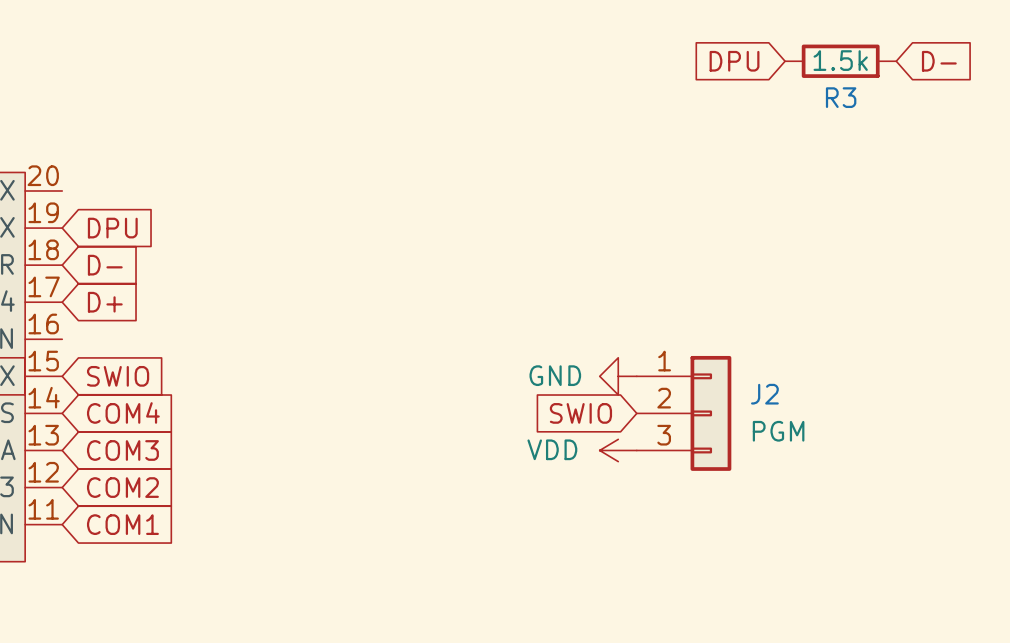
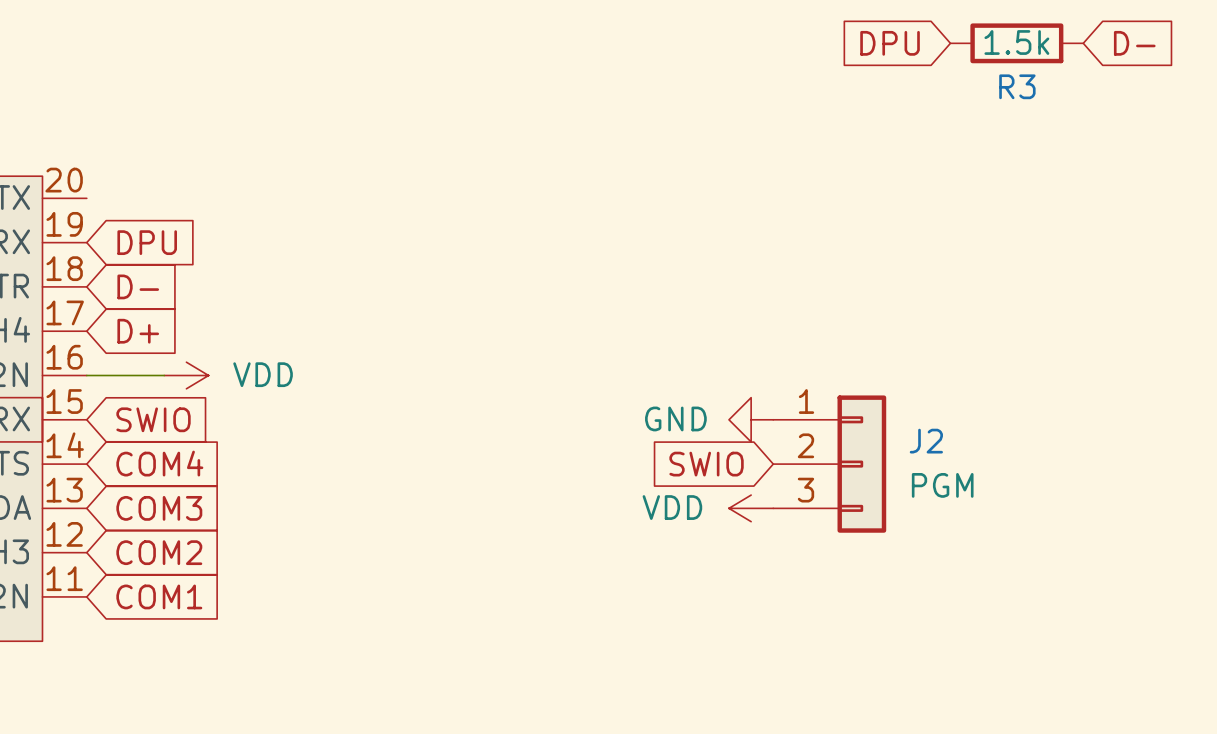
wire: none -> (86, 375) (164, 375)
power symbol: none -> VDD (186, 375)

